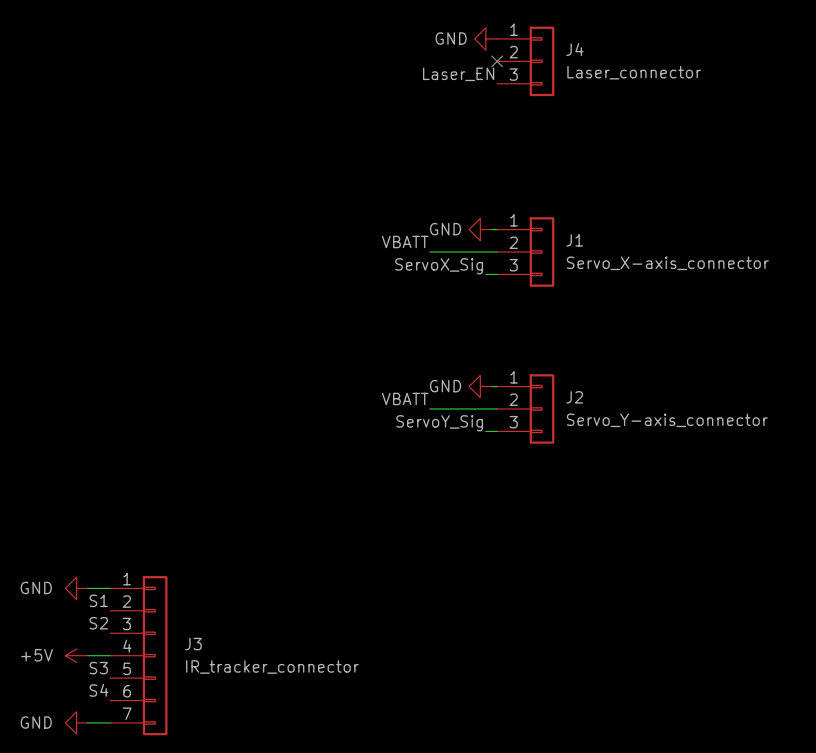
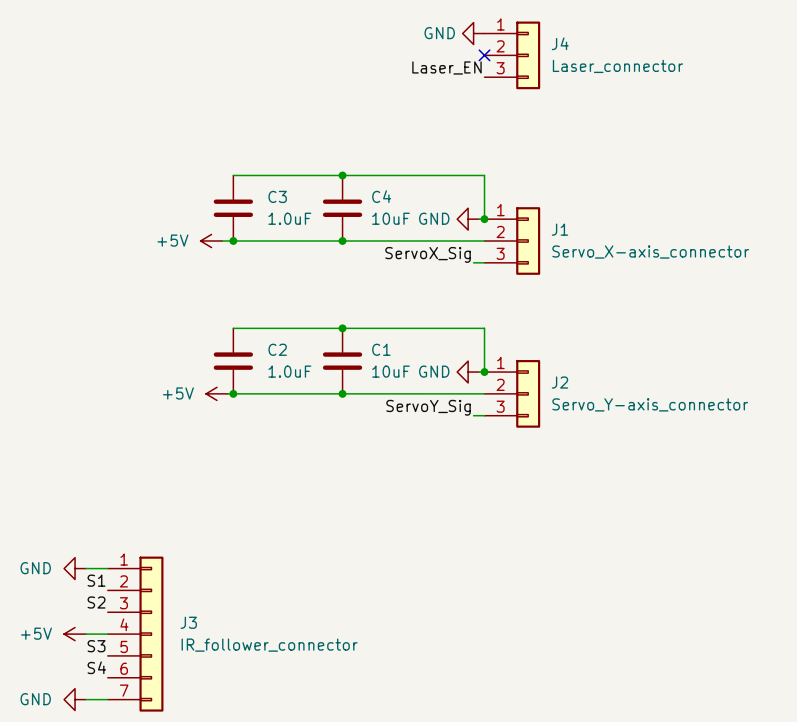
wire: none -> (233, 175) (484, 175) (484, 219)
junction: none -> (342, 175)
C3: none -> 1.0uF (233, 208)
C4: none -> 10uF (342, 208)
junction: none -> (484, 219)
label: VBATT (405, 241) -> none
power symbol: none -> +5V (211, 241)
wire: none -> (222, 241) (418, 241)
junction: none -> (233, 241)
junction: none -> (342, 241)
wire: none -> (233, 328) (484, 328) (484, 372)
junction: none -> (342, 328)
C2: none -> 1.0uF (233, 361)
C1: none -> 10uF (342, 361)
junction: none -> (484, 372)
label: VBATT (405, 398) -> none
power symbol: none -> +5V (216, 393)
wire: none -> (227, 393) (418, 393)
junction: none -> (233, 393)
junction: none -> (342, 393)
J3 value: IR_tracker_connector (272, 667) -> IR_follower_connector (269, 645)

